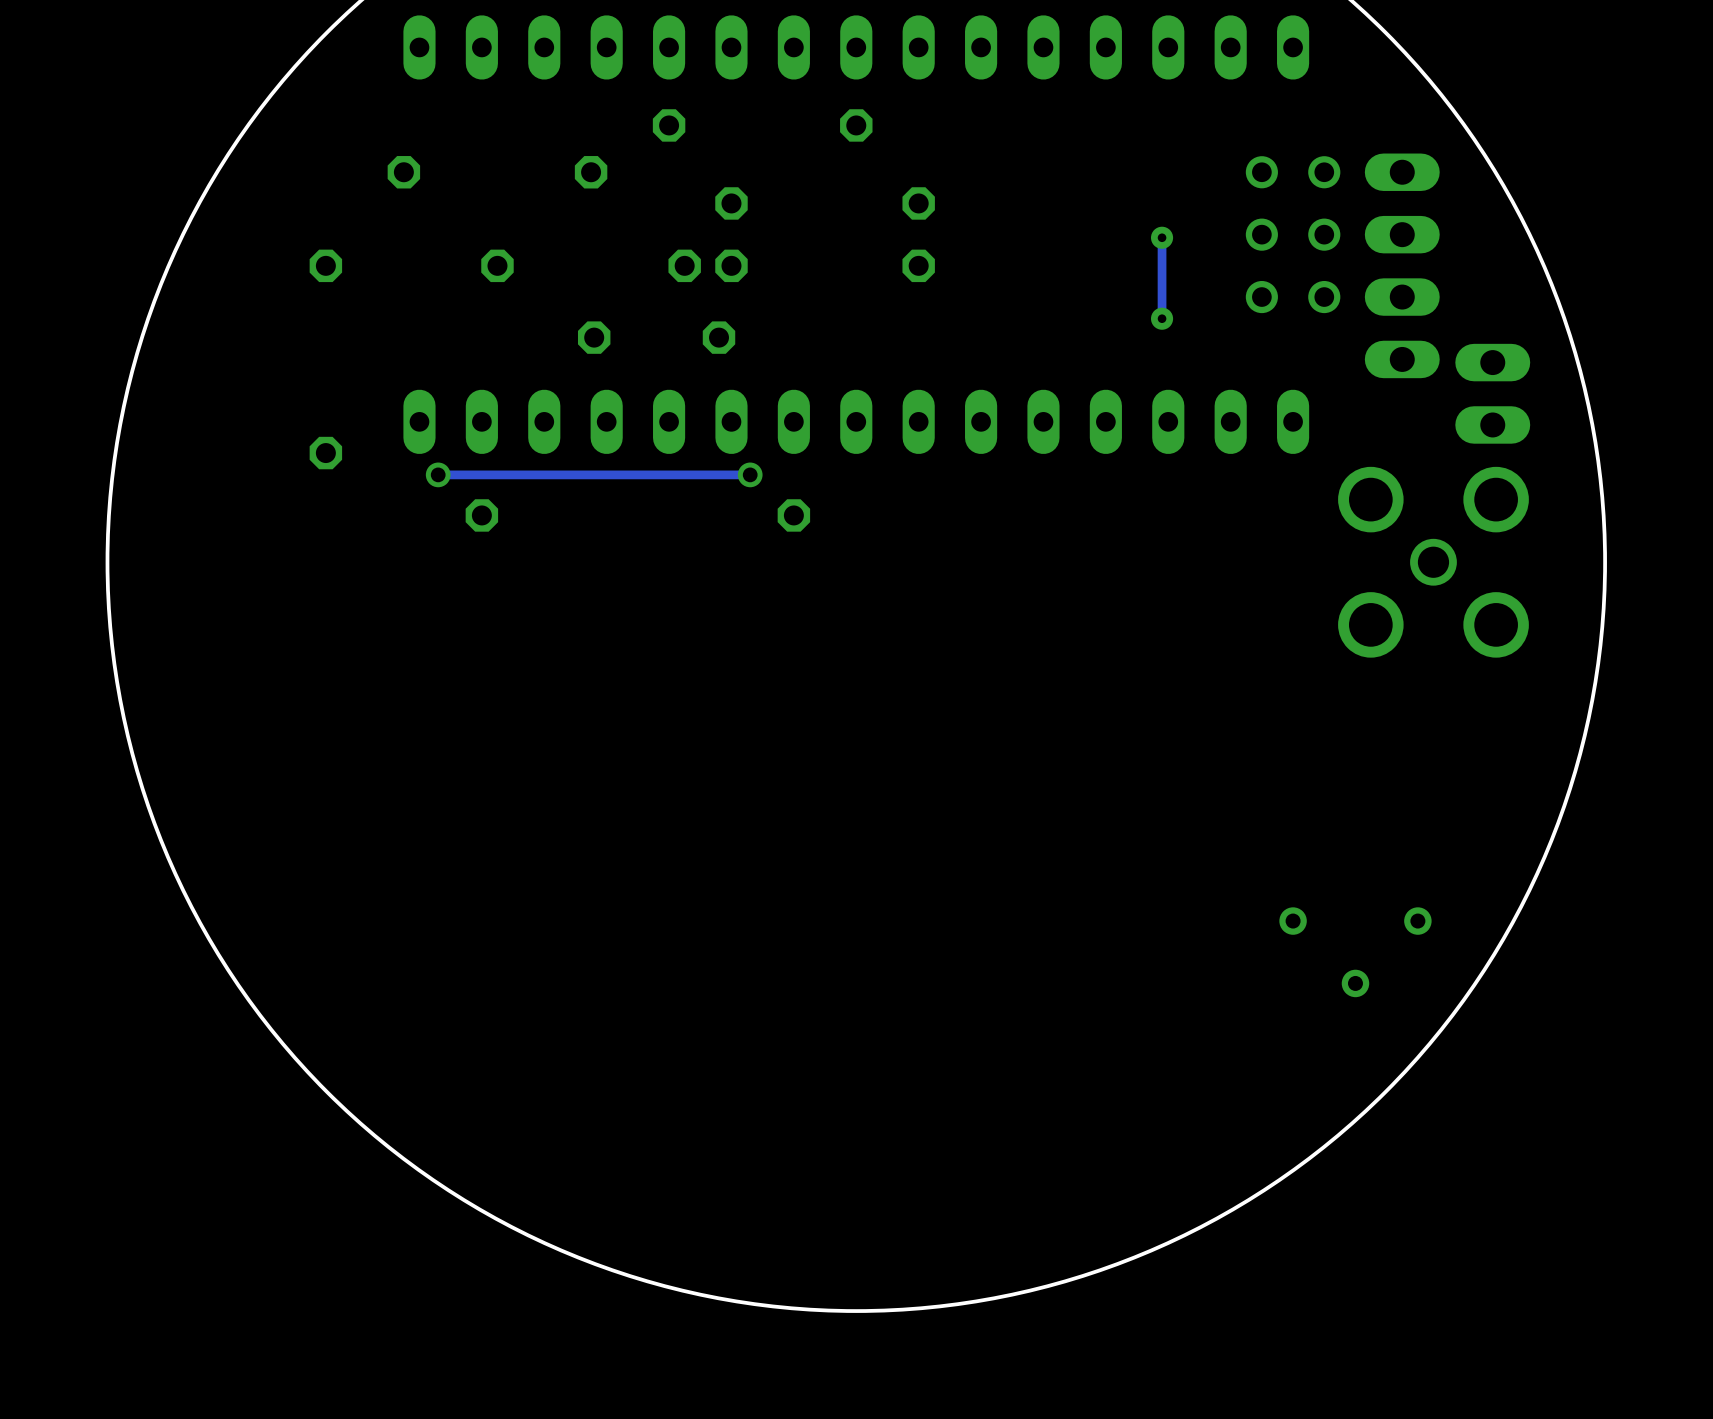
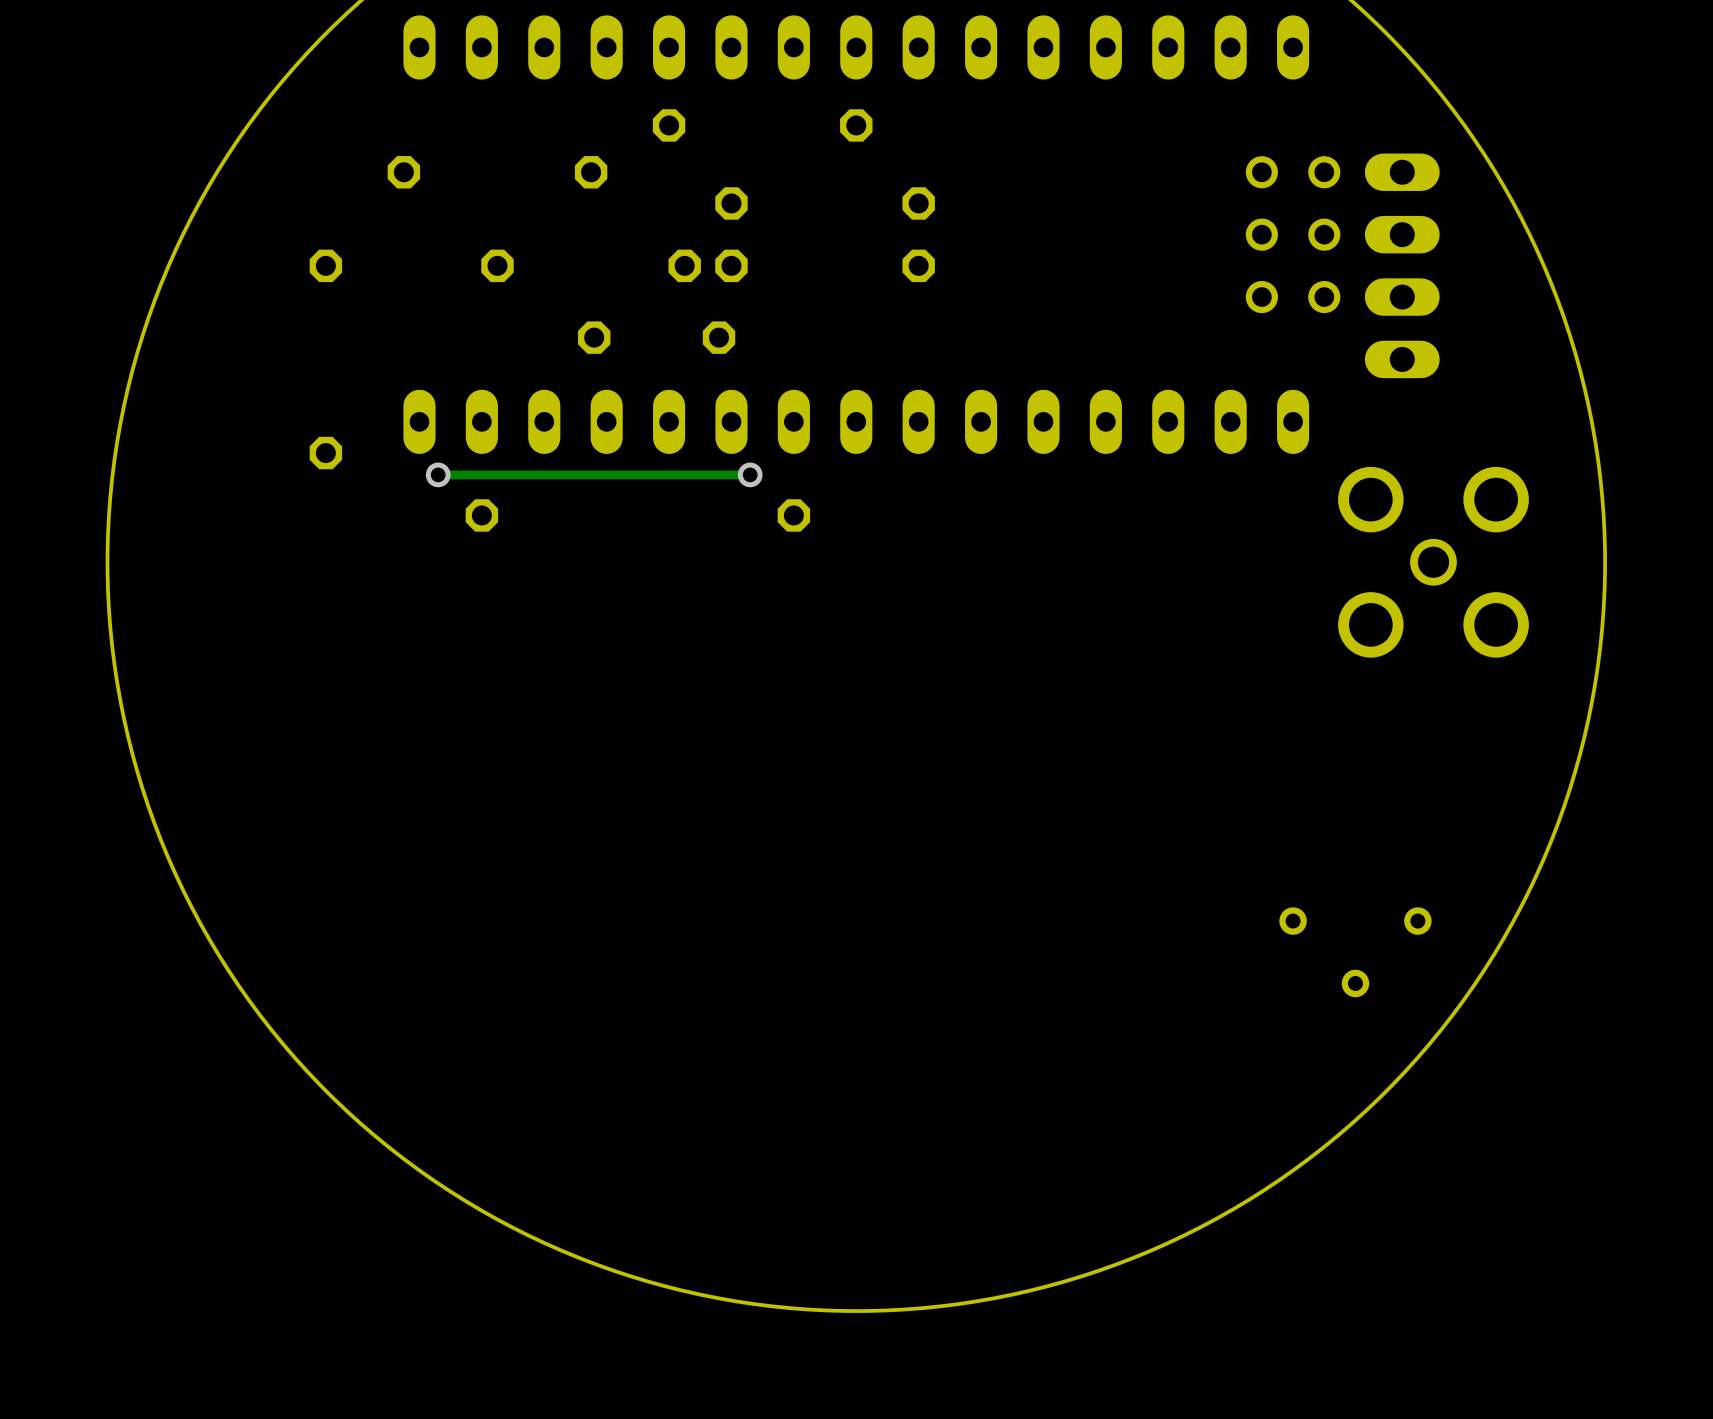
track: (1162, 237) (1162, 318) -> none
via: (1162, 237) -> none
via: (1162, 318) -> none
part: (1492, 393) -> none

